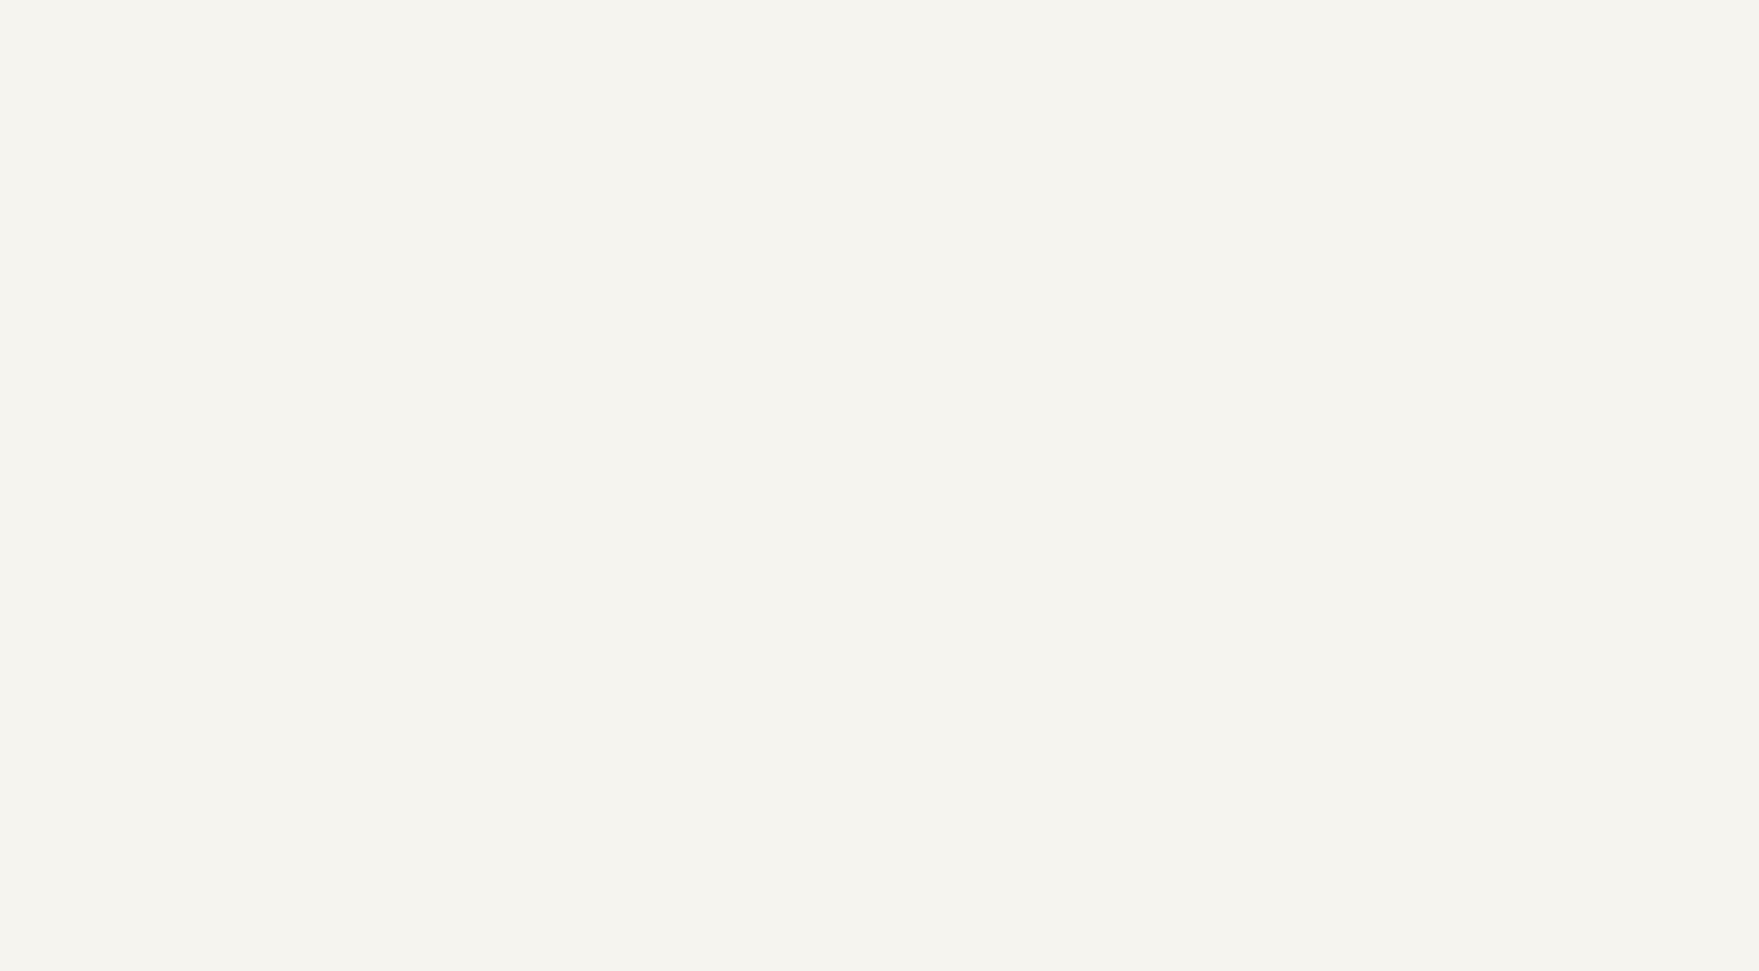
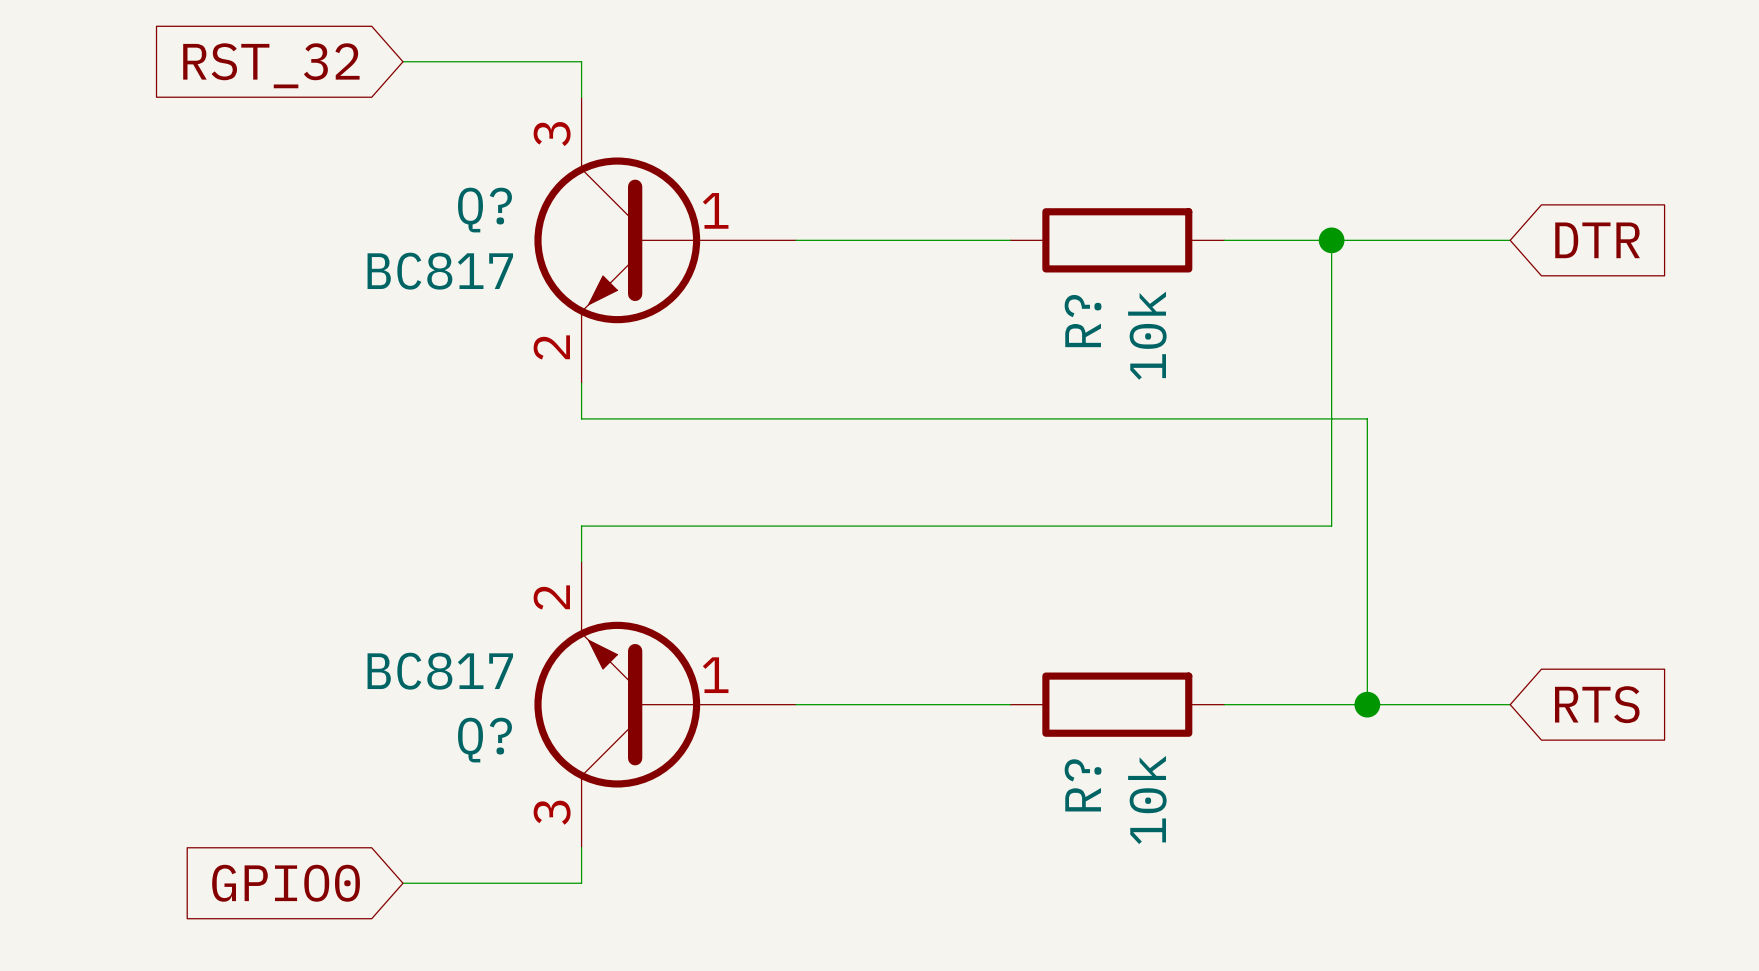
wire: none -> (402, 61) (581, 61) (581, 97)
global label: none -> RST_32 (271, 65)
Q?: none -> BC817 (665, 240)
wire: none -> (795, 240) (1010, 240)
R?: none -> 10k (1117, 240)
wire: none -> (1224, 240) (1510, 240)
wire: none -> (1331, 240) (1331, 526) (581, 526) (581, 561)
junction: none -> (1331, 240)
global label: none -> DTR (1597, 240)
wire: none -> (581, 383) (581, 418) (1367, 418) (1367, 704)
Q?: none -> BC817 (665, 704)
wire: none -> (795, 704) (1010, 704)
R?: none -> 10k (1117, 704)
wire: none -> (1224, 704) (1510, 704)
junction: none -> (1367, 704)
global label: none -> RTS (1597, 704)
wire: none -> (581, 847) (581, 883) (402, 883)
global label: none -> GPIO0 (286, 883)

